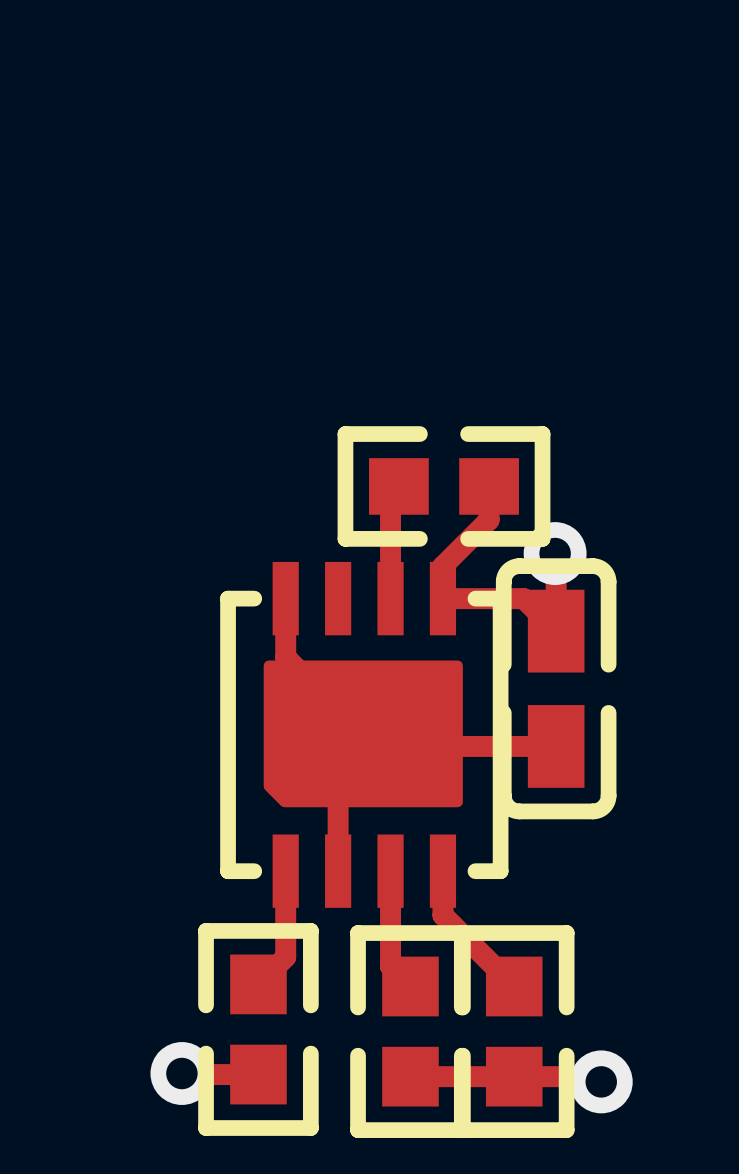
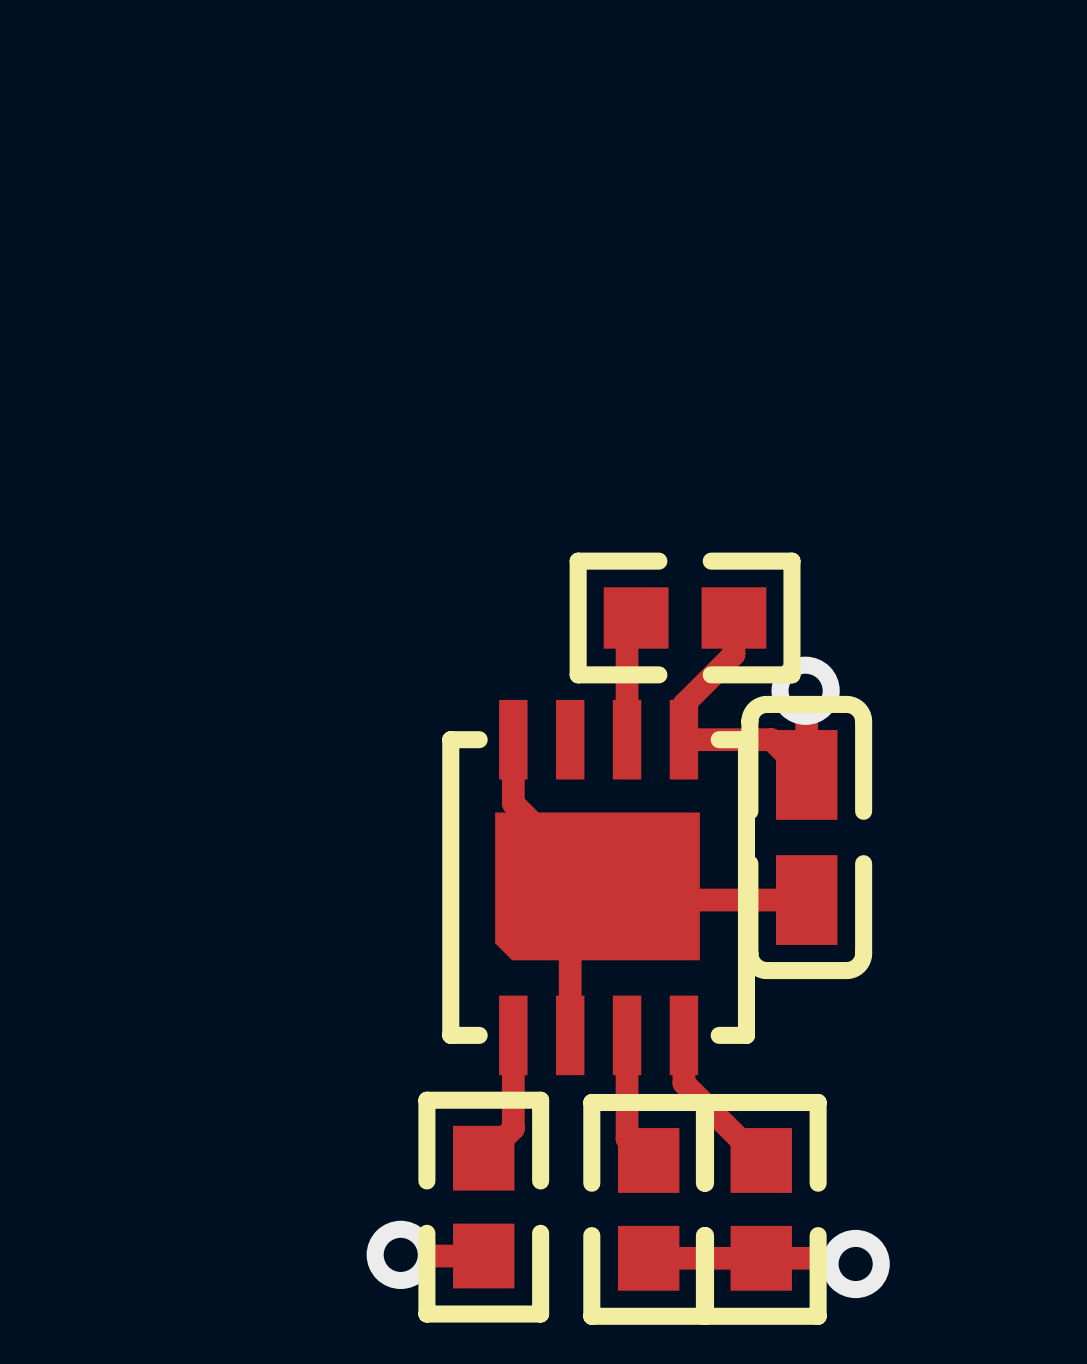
part footprint: [216, 561, 509, 917] -> [438, 699, 756, 1085]

